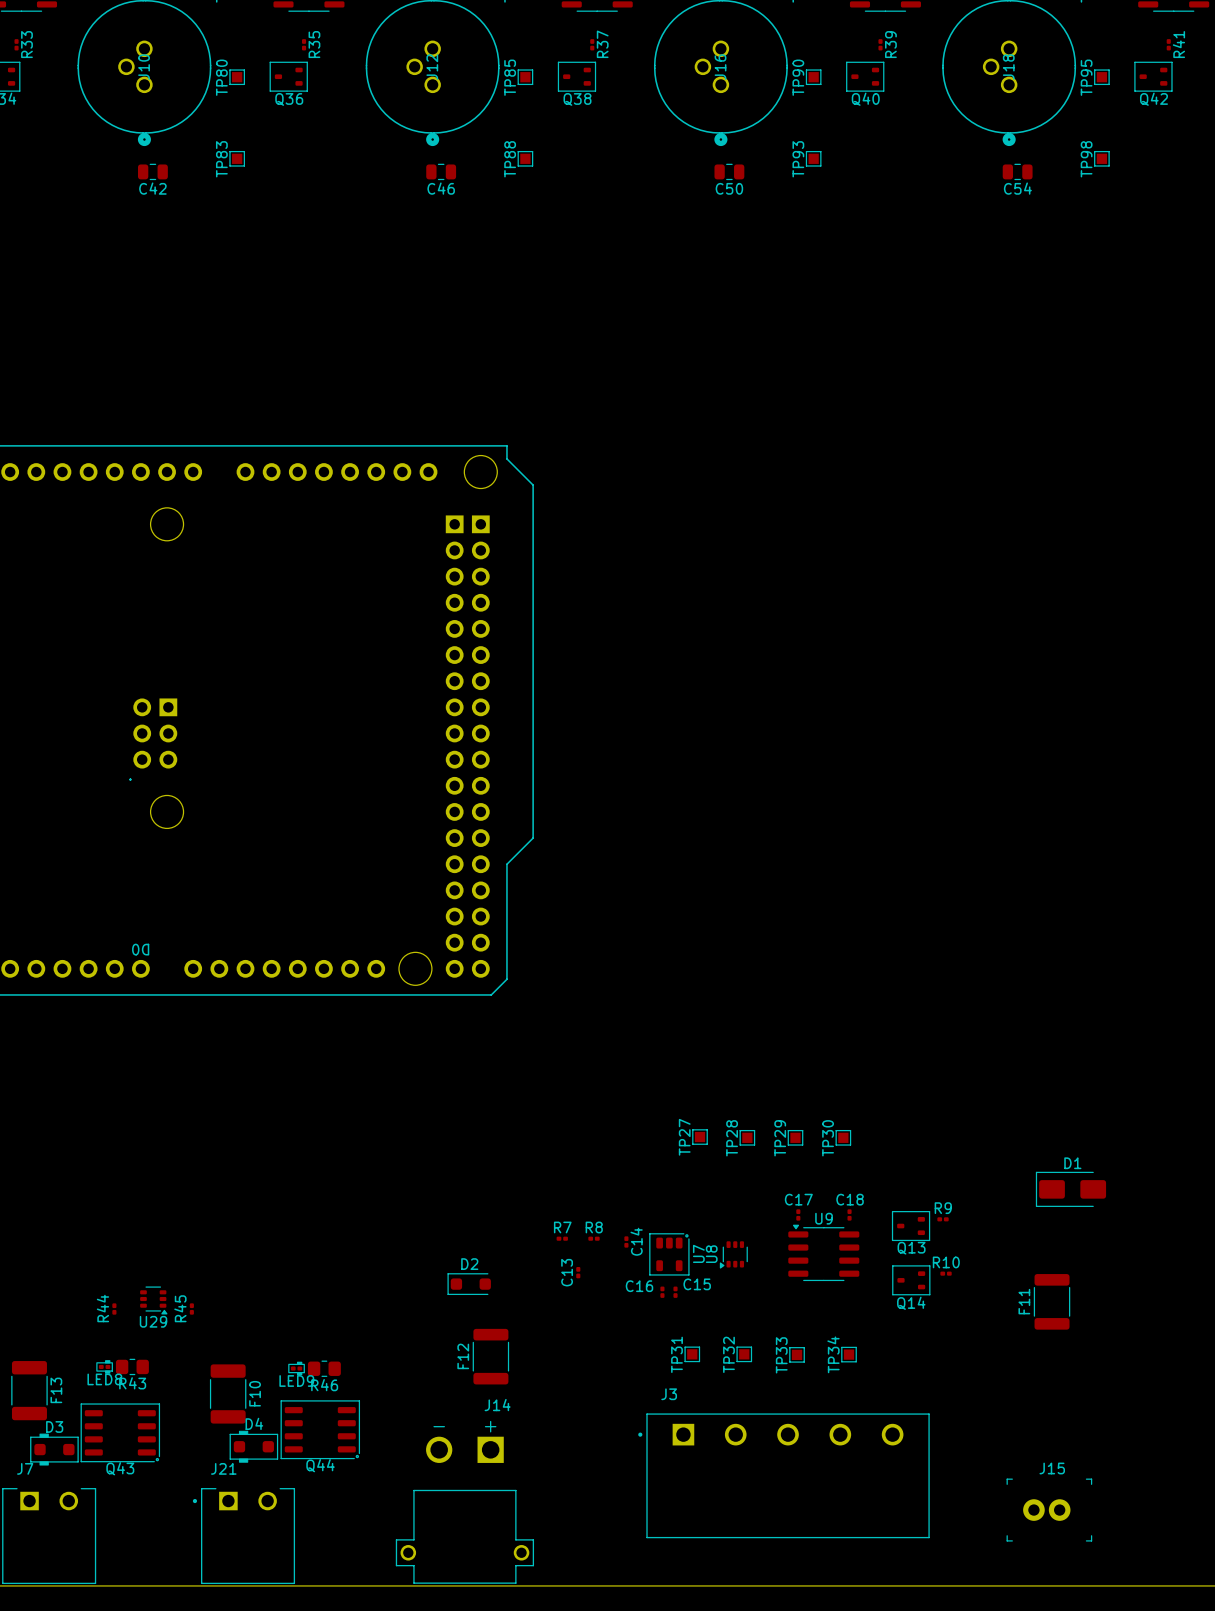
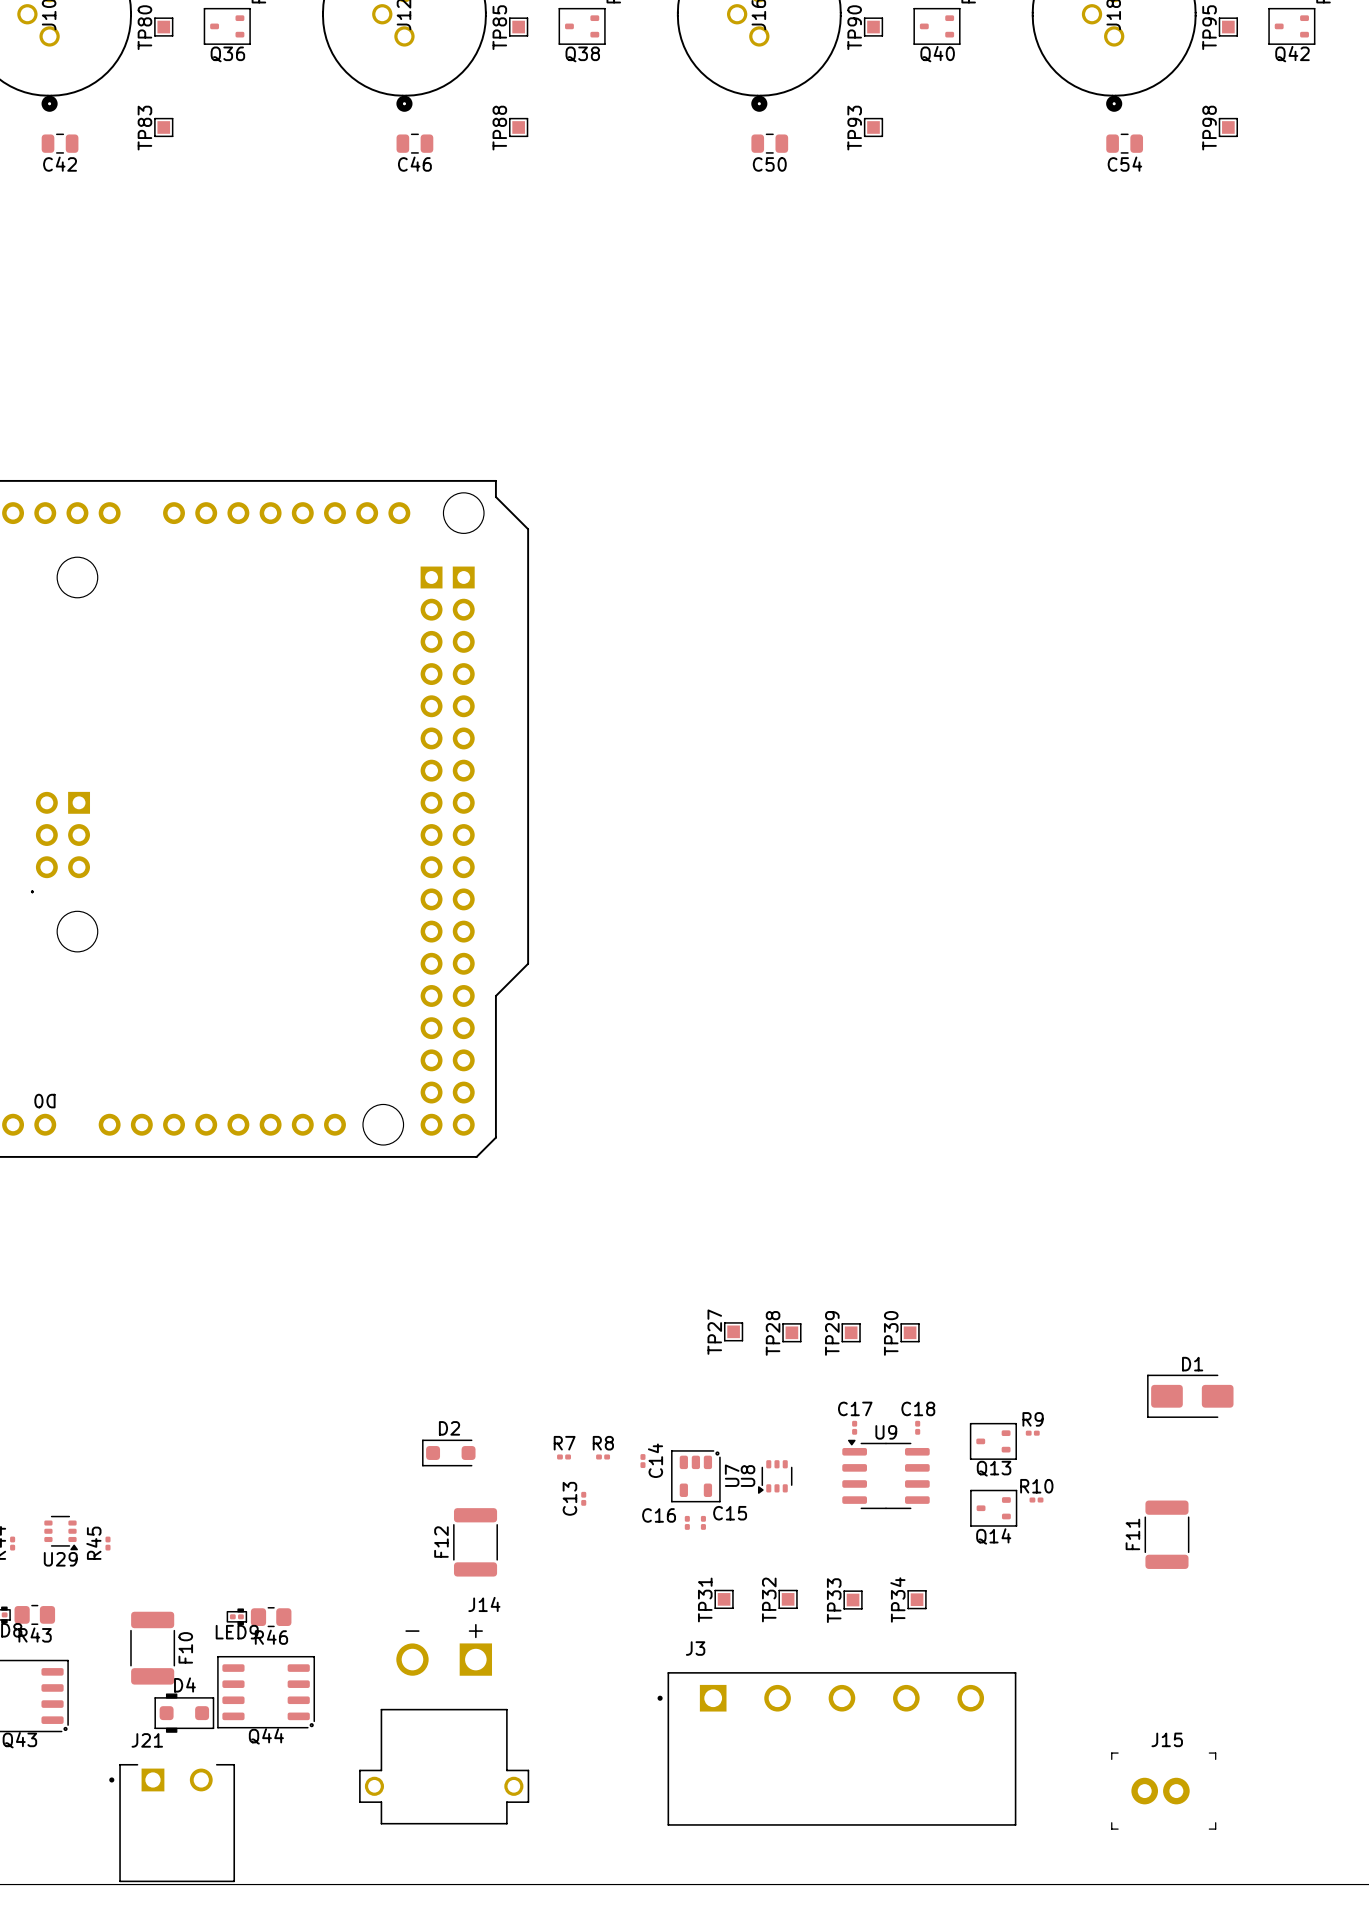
D2 position: (469, 1284) -> (448, 1452)
F12 position: (490, 1356) -> (475, 1542)
J14 position: (464, 1502) -> (444, 1724)

